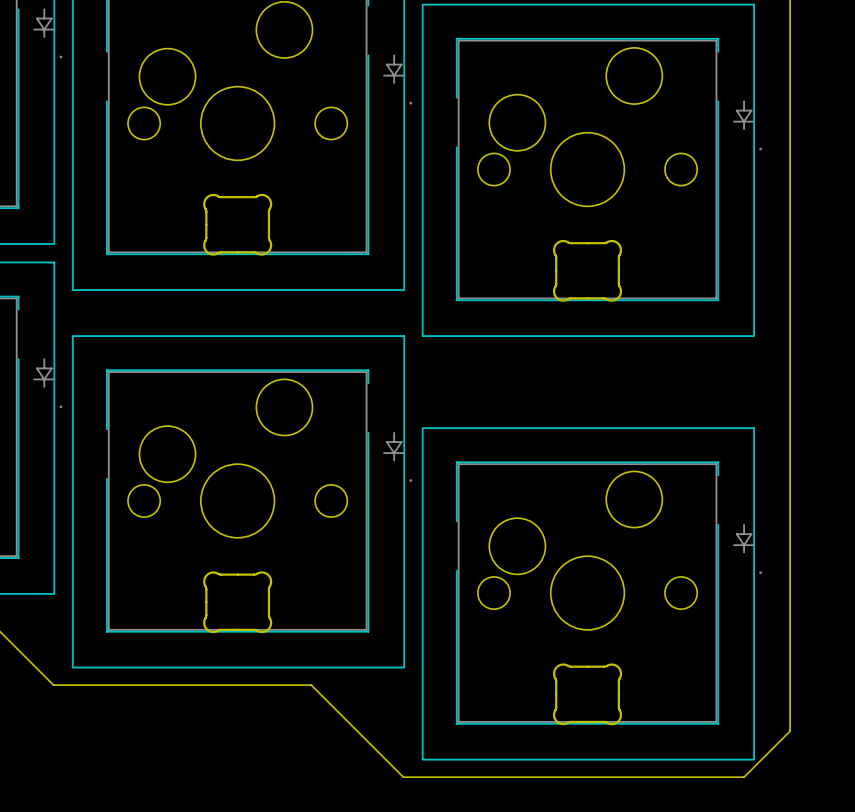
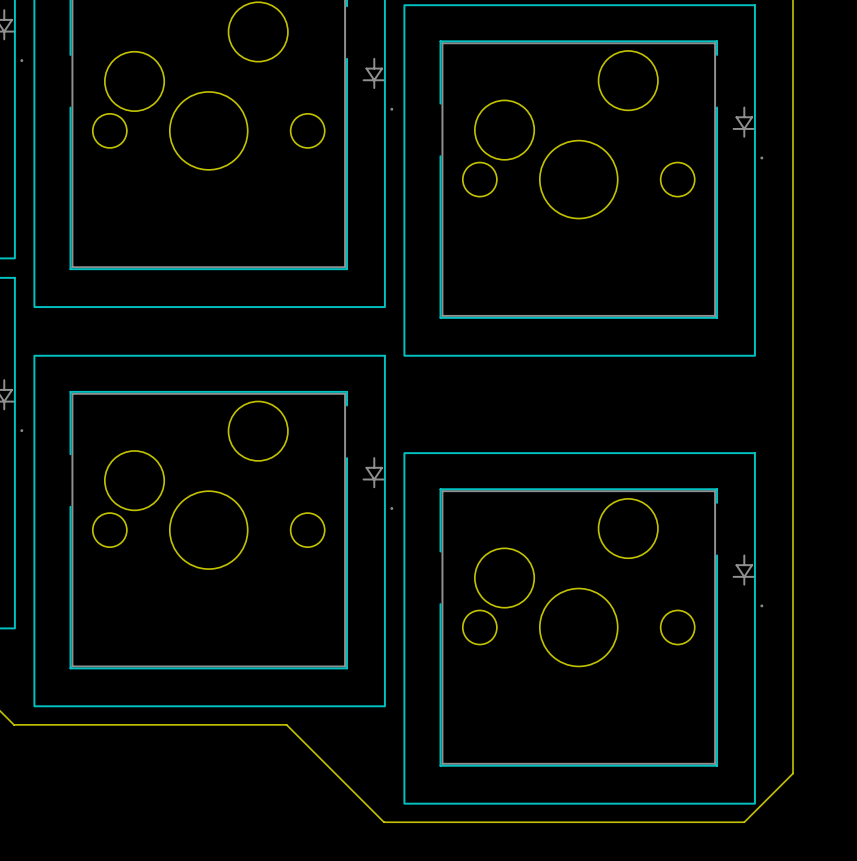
part: (237, 224) -> none
part: (587, 270) -> none
part: (237, 602) -> none
part: (587, 694) -> none

